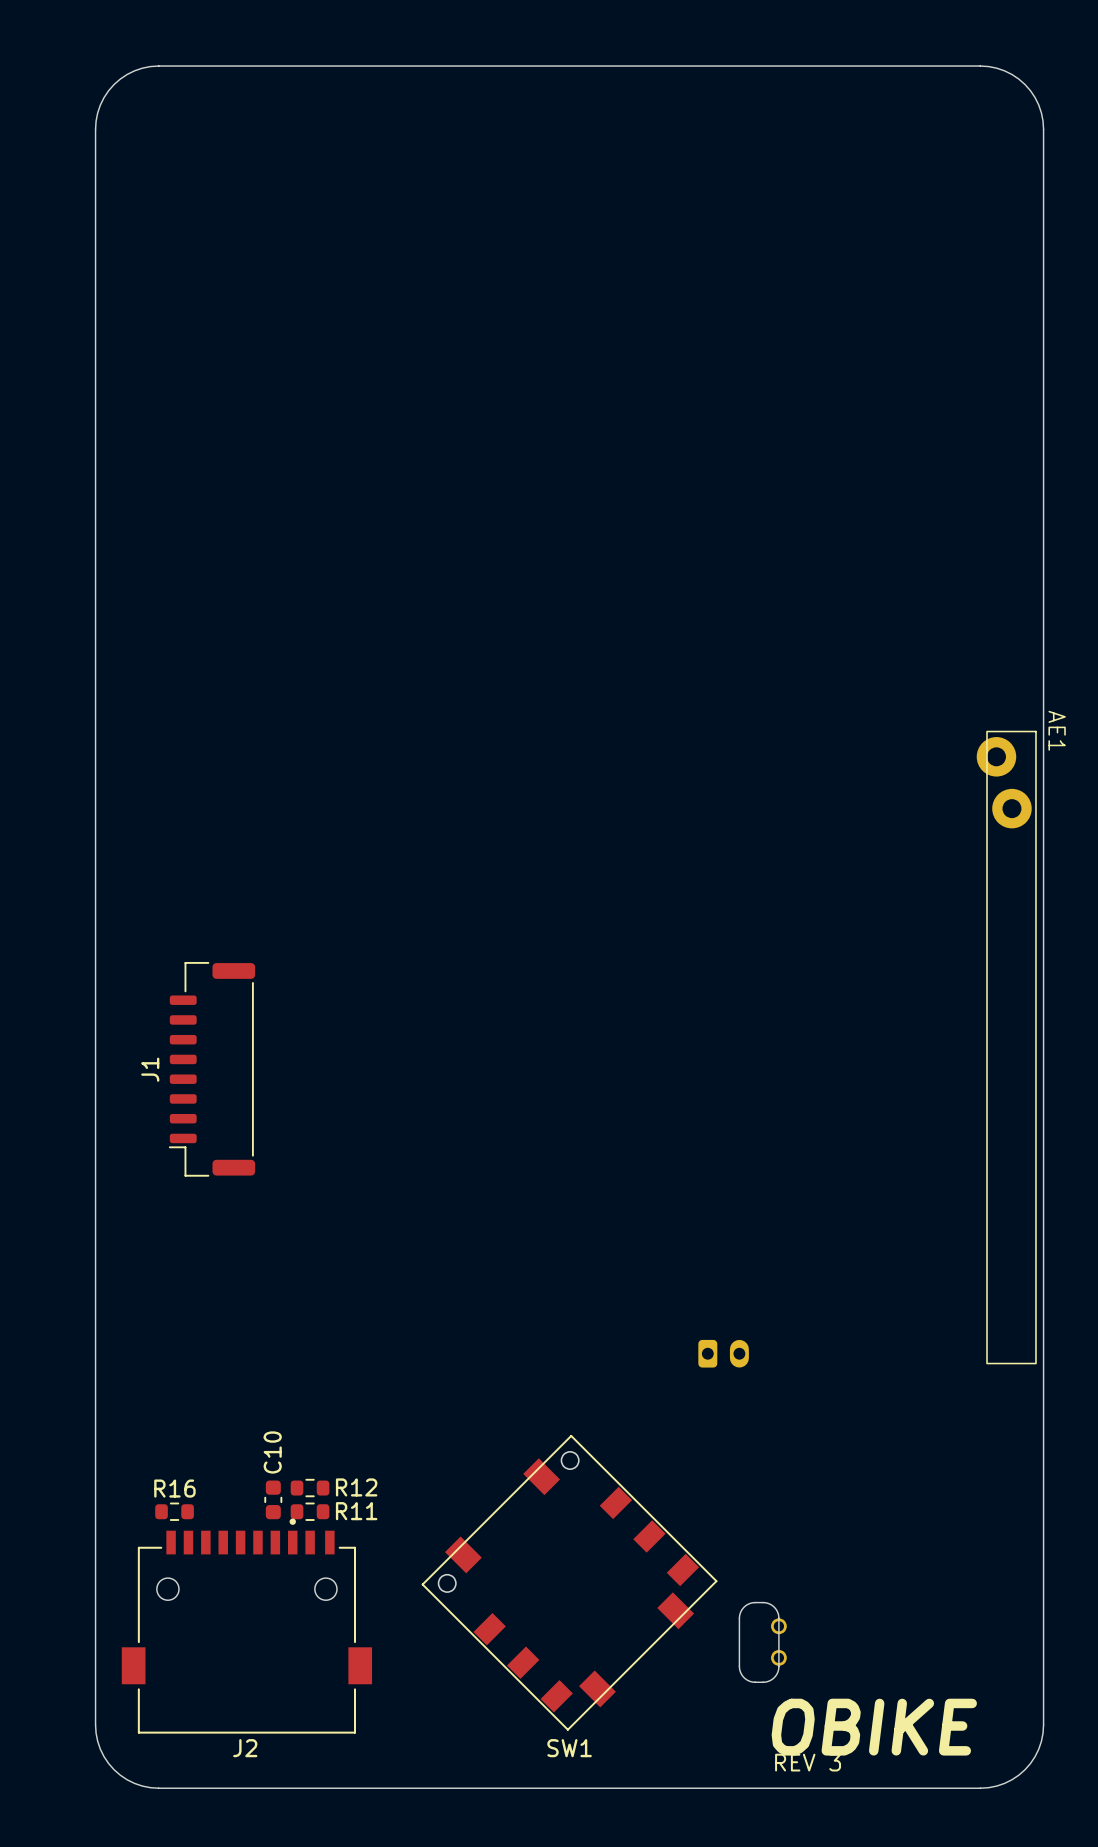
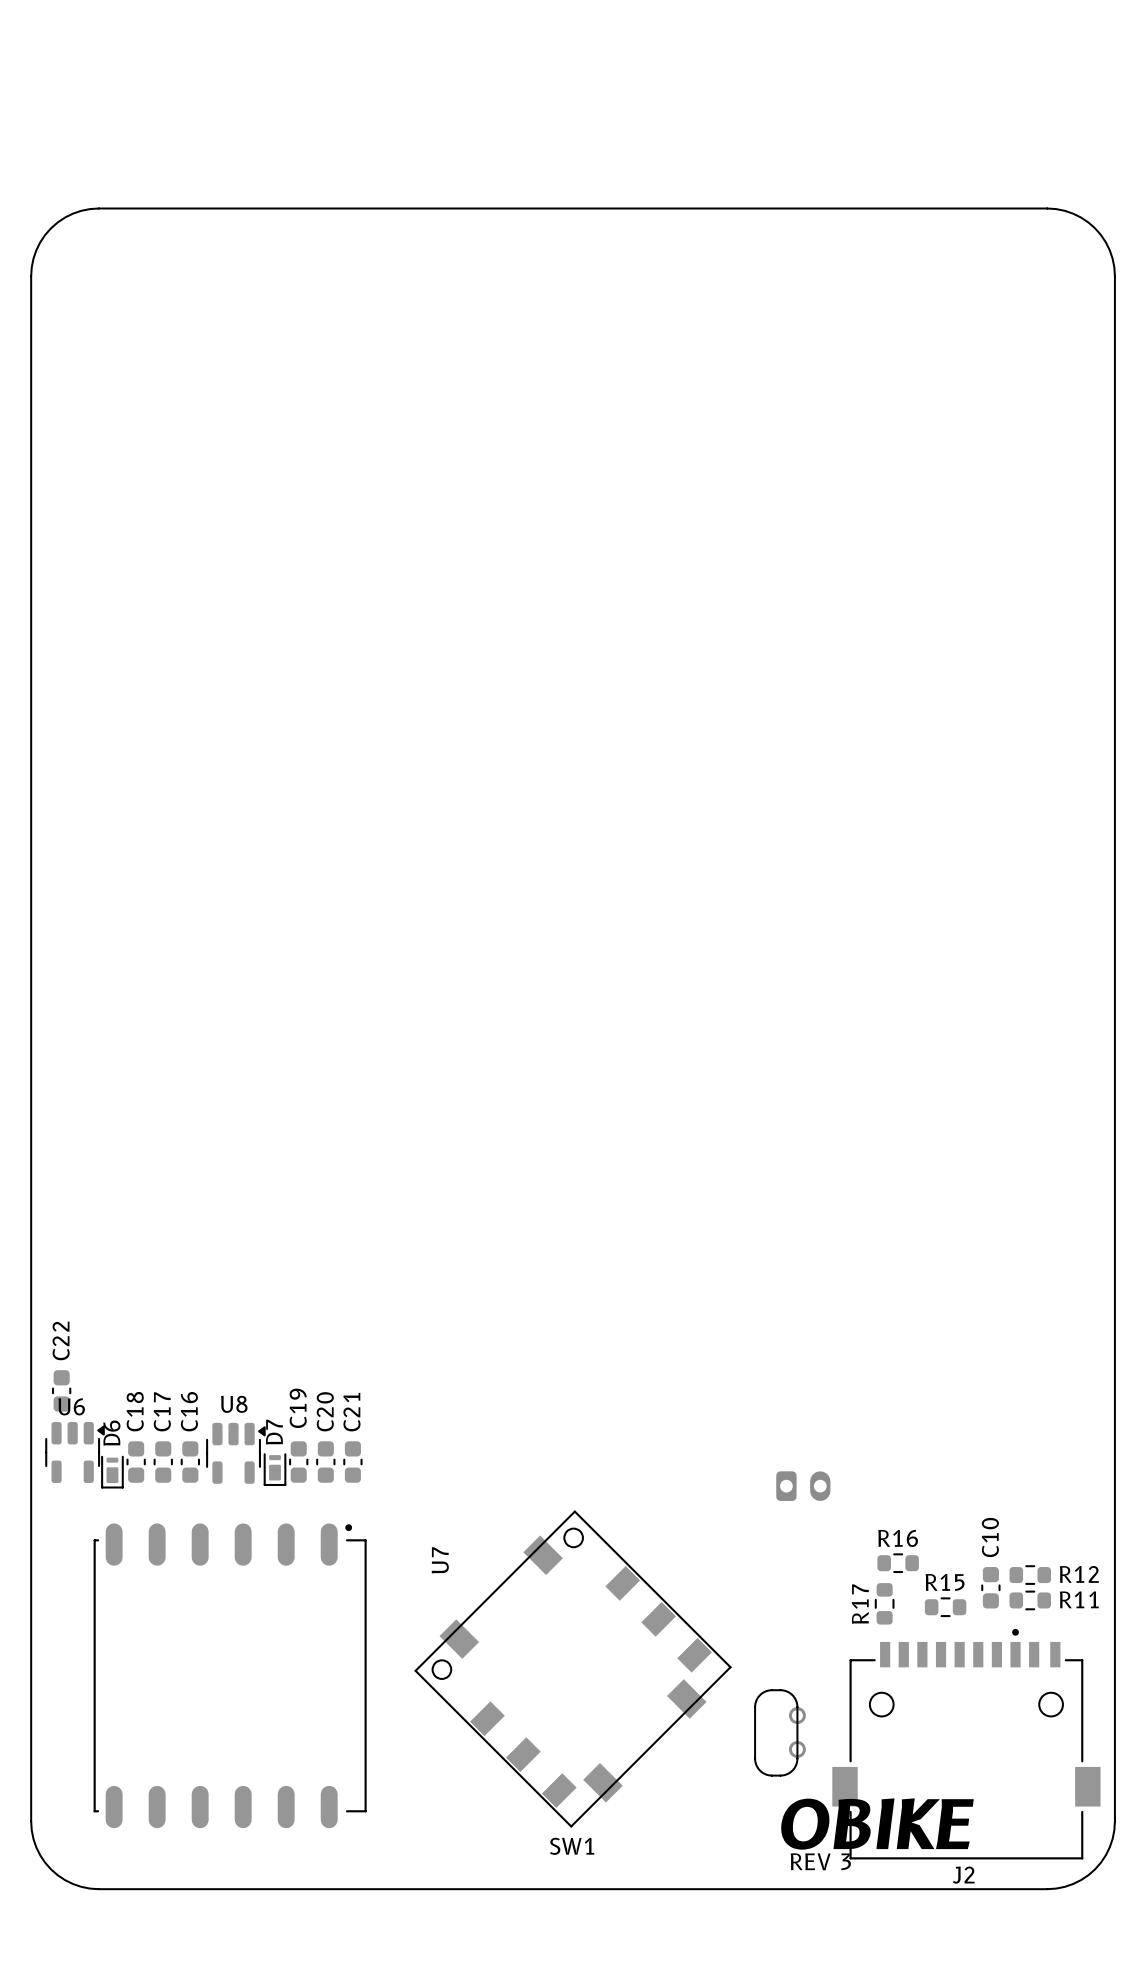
AE1: (1006, 1047) -> none
J1: (212, 1069) -> none
C22: none -> (61, 1390)
part position: (723, 1353) -> (803, 1486)
U6: none -> (75, 1452)
U8: none -> (235, 1453)
C18: none -> (136, 1462)
C17: none -> (163, 1462)
C16: none -> (190, 1462)
C19: none -> (298, 1462)
C20: none -> (325, 1462)
C21: none -> (352, 1462)
D7: none -> (275, 1469)
D6: none -> (112, 1472)
R12 position: (310, 1488) -> (1030, 1575)
C10 position: (273, 1499) -> (990, 1587)
R16 position: (174, 1511) -> (898, 1563)
R11 position: (310, 1511) -> (1030, 1600)
R17: none -> (884, 1603)
R15: none -> (945, 1607)
U7: none -> (230, 1675)
J2 position: (246, 1626) -> (966, 1744)
board edge: (158, 1788) (134, 1783) (114, 1769) (100, 1749) (95, 1725) (95, 129) (100, 105) (114, 84) (134, 70) (158, 66) (980, 66) (996, 68) (1011, 74) (1030, 90) (1038, 105) (1043, 129) (1043, 1725) (1038, 1749) (1025, 1769) (1004, 1783) (980, 1788) -> (132, 1889) (90, 1888) (65, 1880) (51, 1869) (40, 1855) (33, 1838) (31, 1821) (31, 276) (36, 250) (51, 228) (72, 213) (98, 208) (1047, 208) (1064, 210) (1081, 217) (1095, 228) (1105, 242) (1112, 258) (1114, 276) (1114, 1821) (1112, 1838) (1105, 1855) (1095, 1869) (1081, 1880) (1056, 1888) (1013, 1889)

